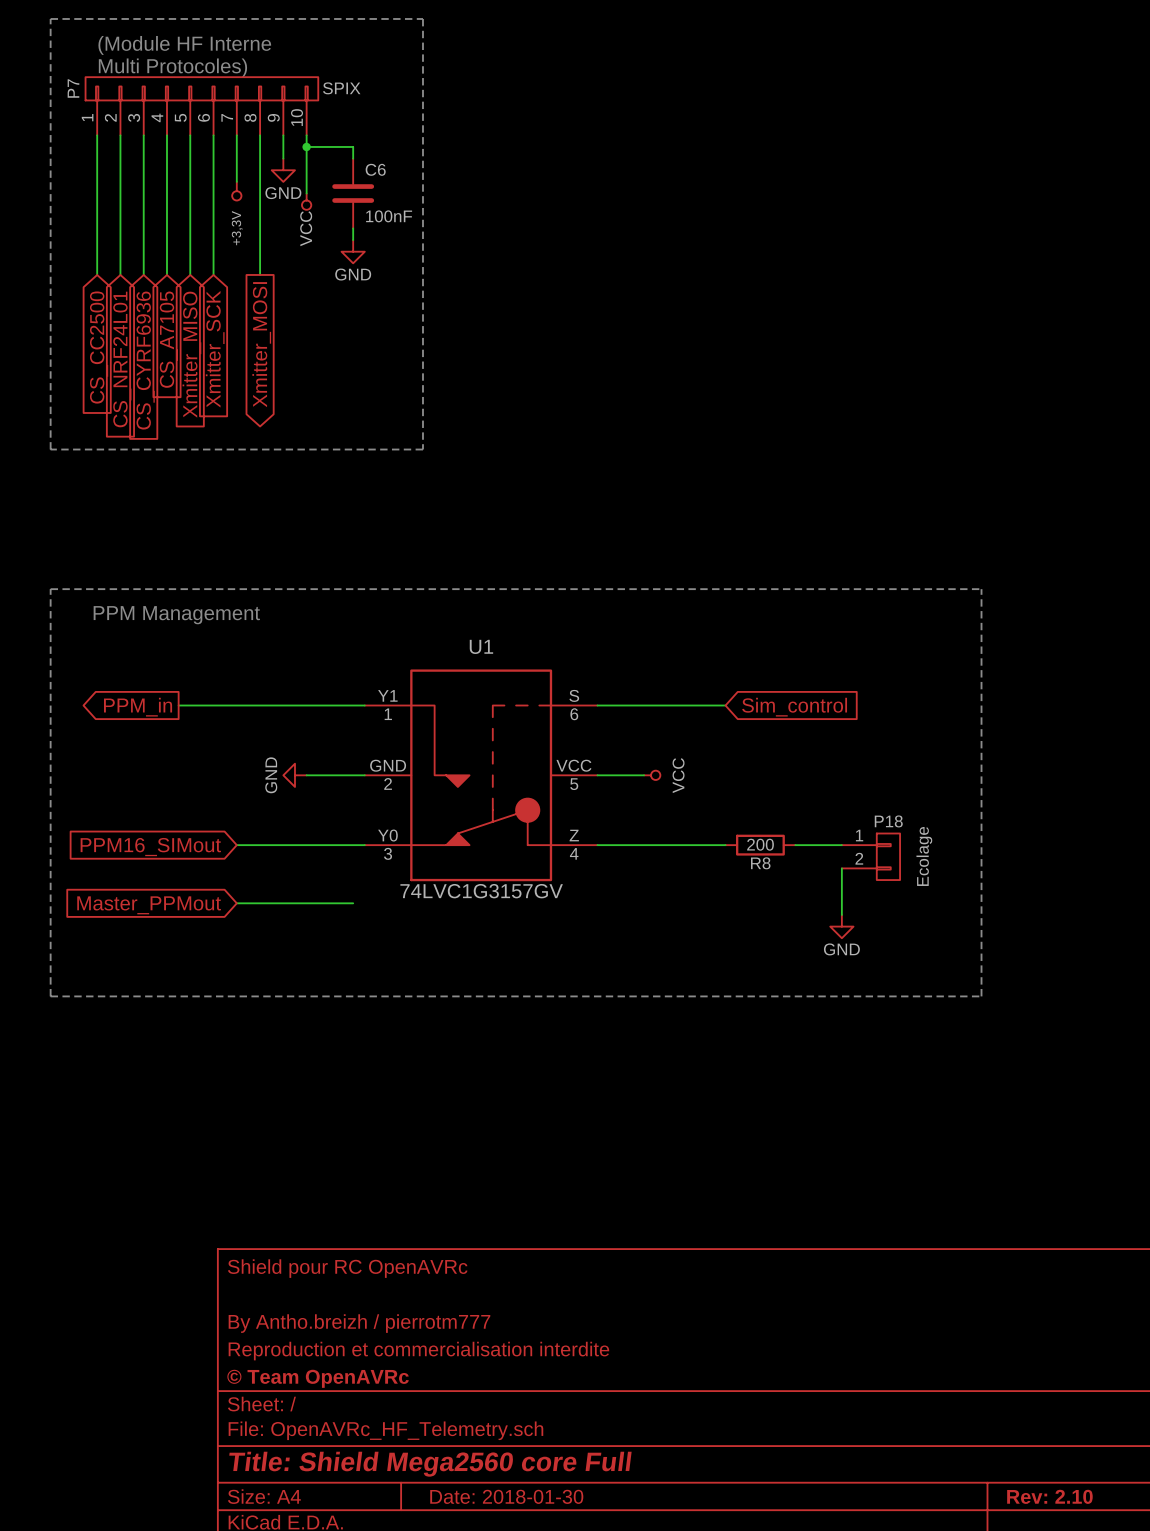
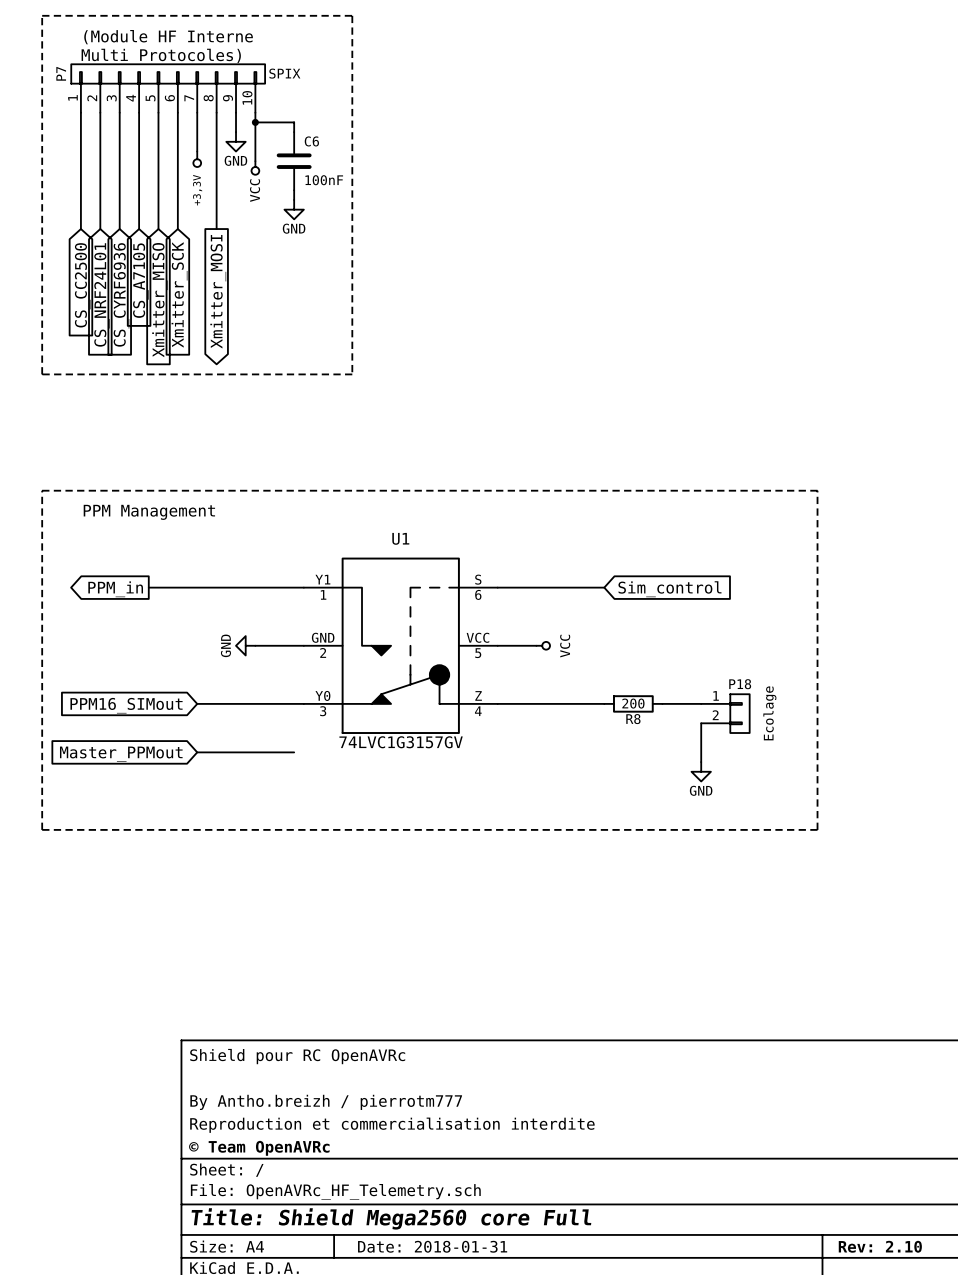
title block: Date: 2018-01-30 (506, 1496) -> Date: 2018-01-31 (432, 1246)

